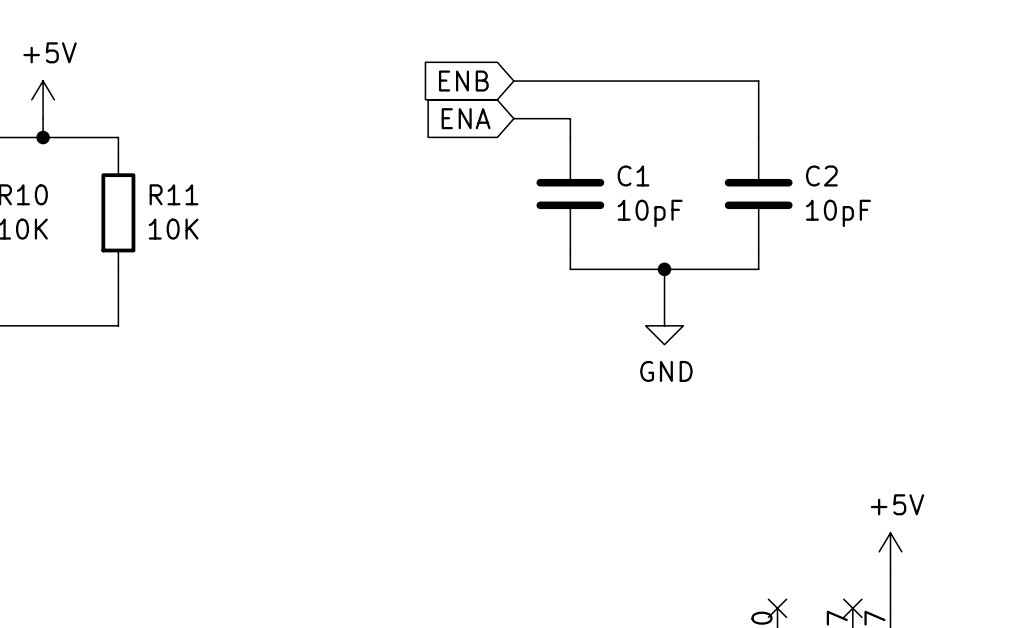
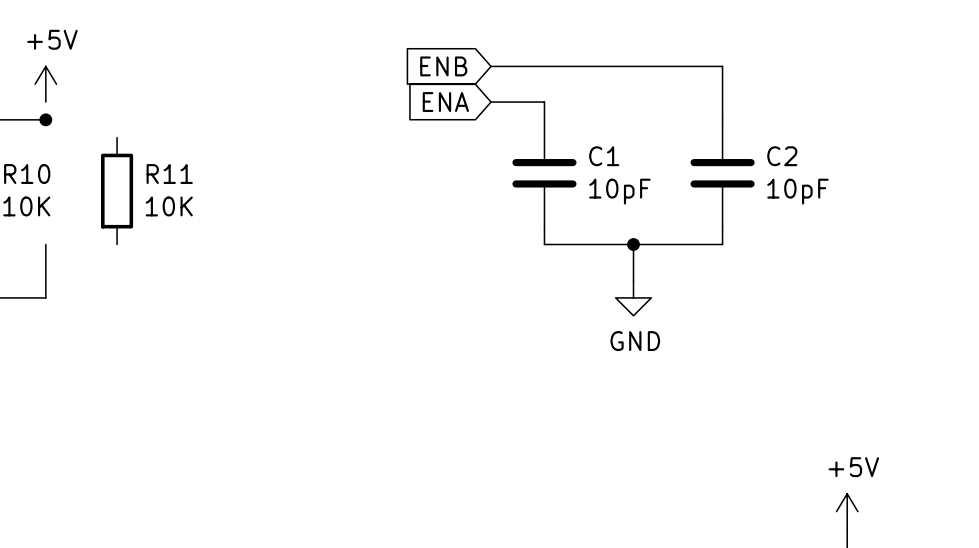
wire: (43, 118) (43, 137) (118, 137) (118, 156) -> none
wire: (118, 269) (118, 325) (43, 325) -> (45, 244) (45, 297)

